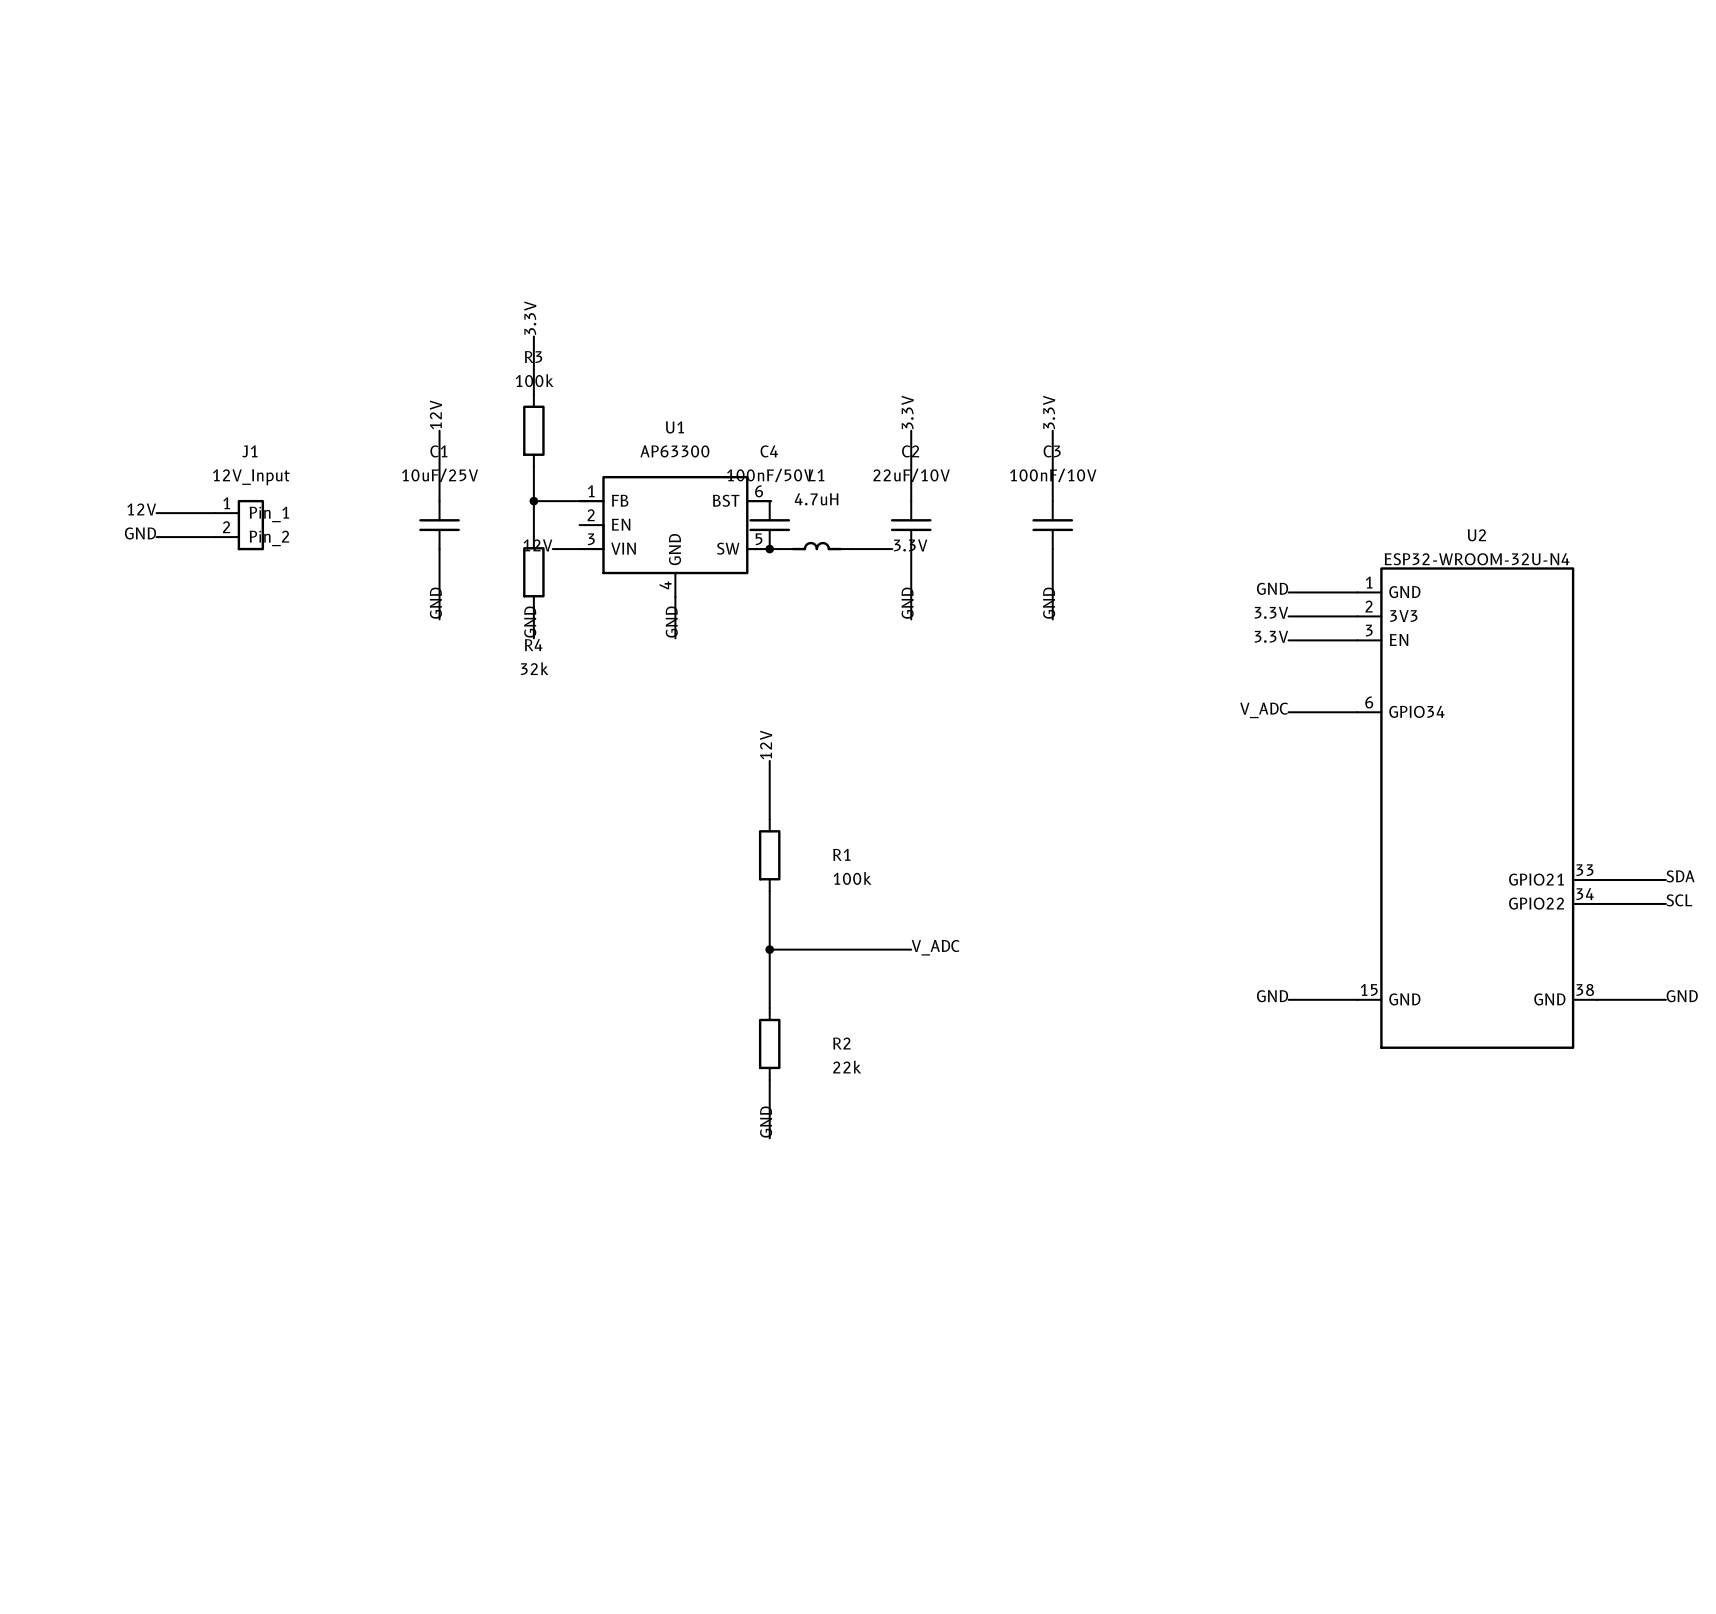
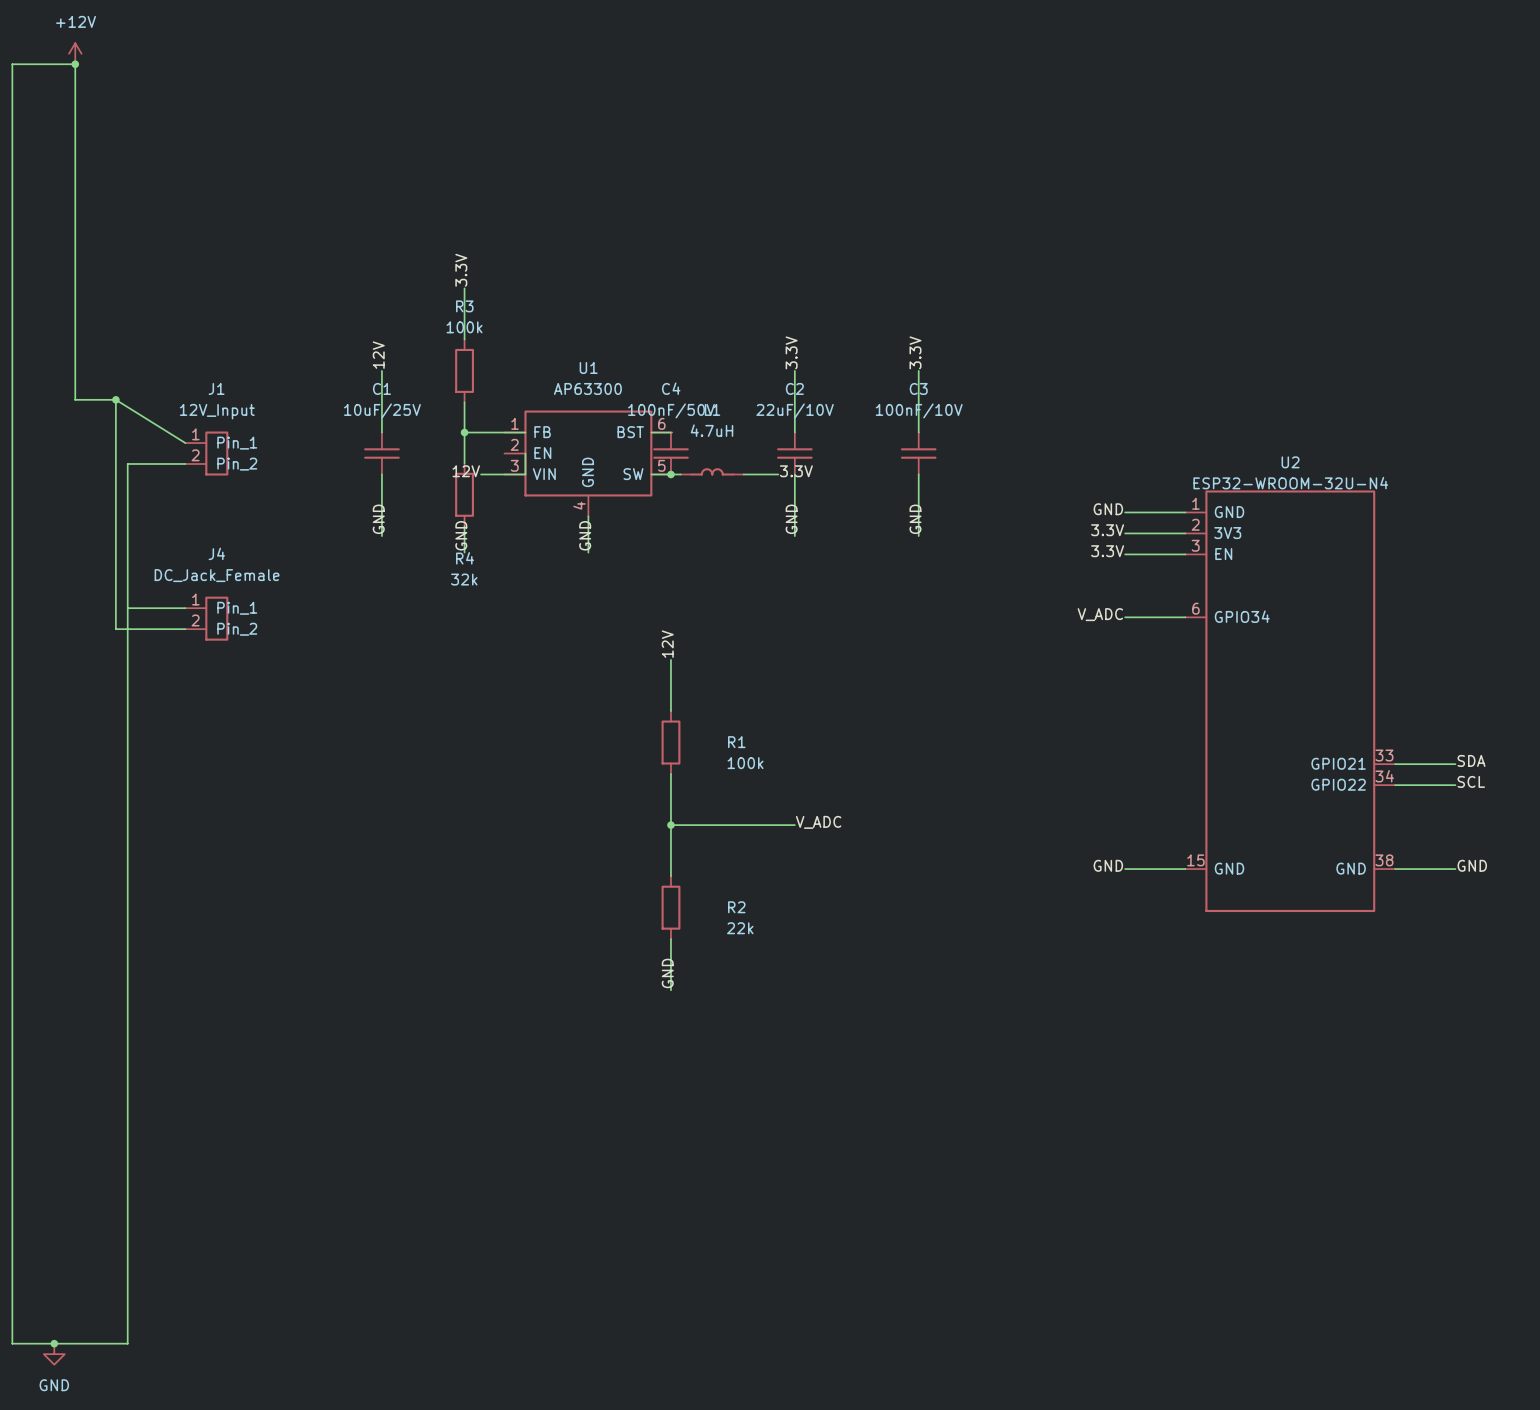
power symbol: none -> +12V (75, 53)
junction: none -> (75, 64)
wire: none -> (115, 399) (75, 399) (75, 64) (12, 64) (12, 1343) (127, 1343) (127, 463) (134, 463)
wire: none -> (115, 399) (115, 629) (185, 629)
junction: none -> (115, 399)
label: 12V (141, 509) -> none
wire: (156, 513) (214, 513) -> (115, 399) (185, 443)
label: GND (140, 533) -> none
wire: none -> (127, 608) (185, 608)
J4: none -> DC_Jack_Female (206, 618)
junction: none -> (54, 1343)
power symbol: none -> GND (54, 1354)

